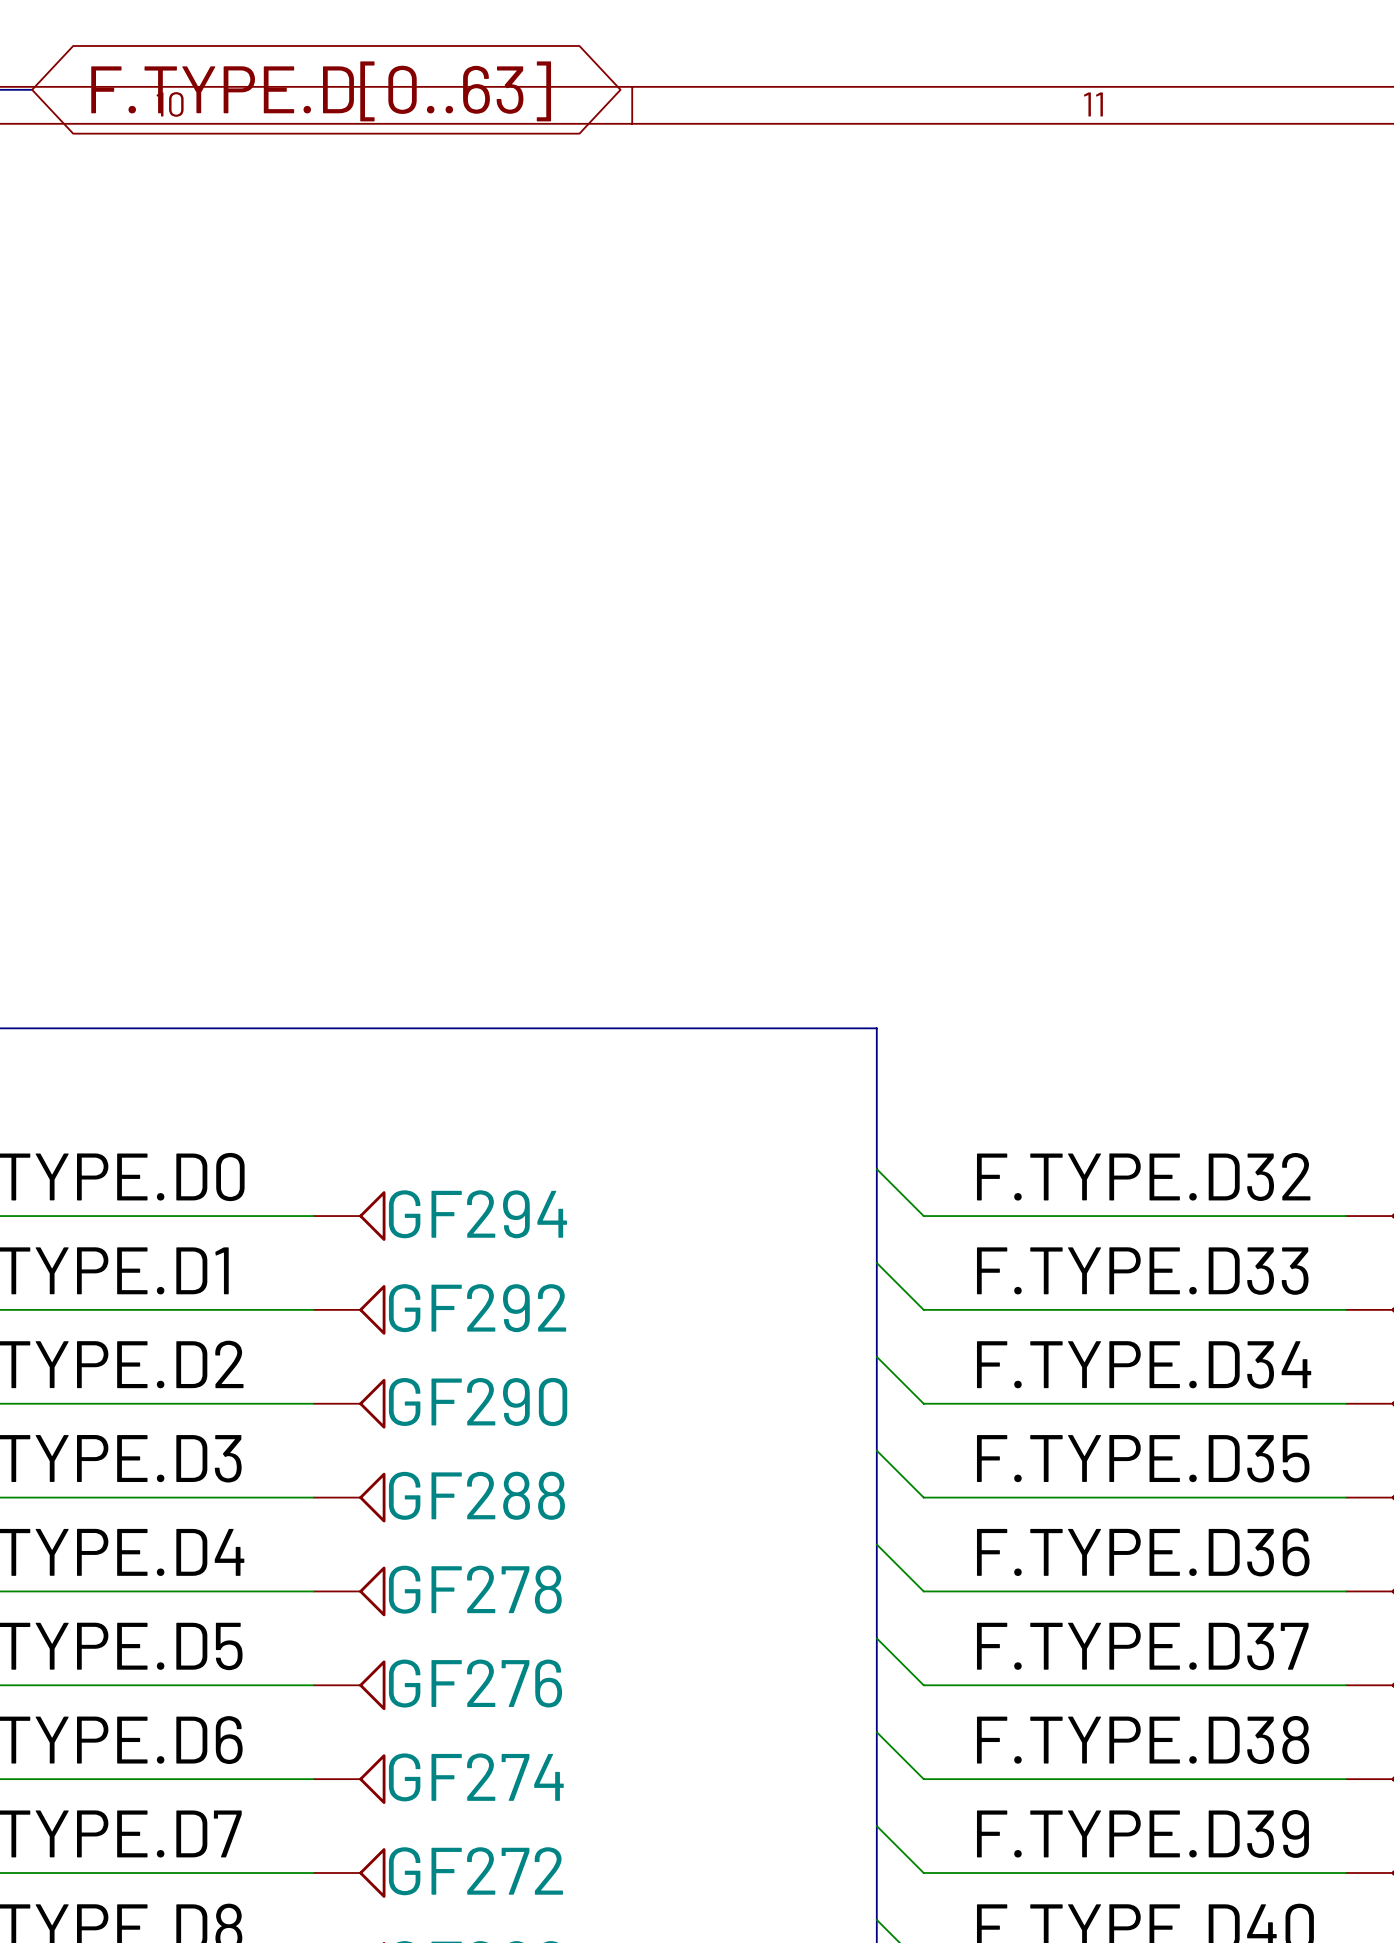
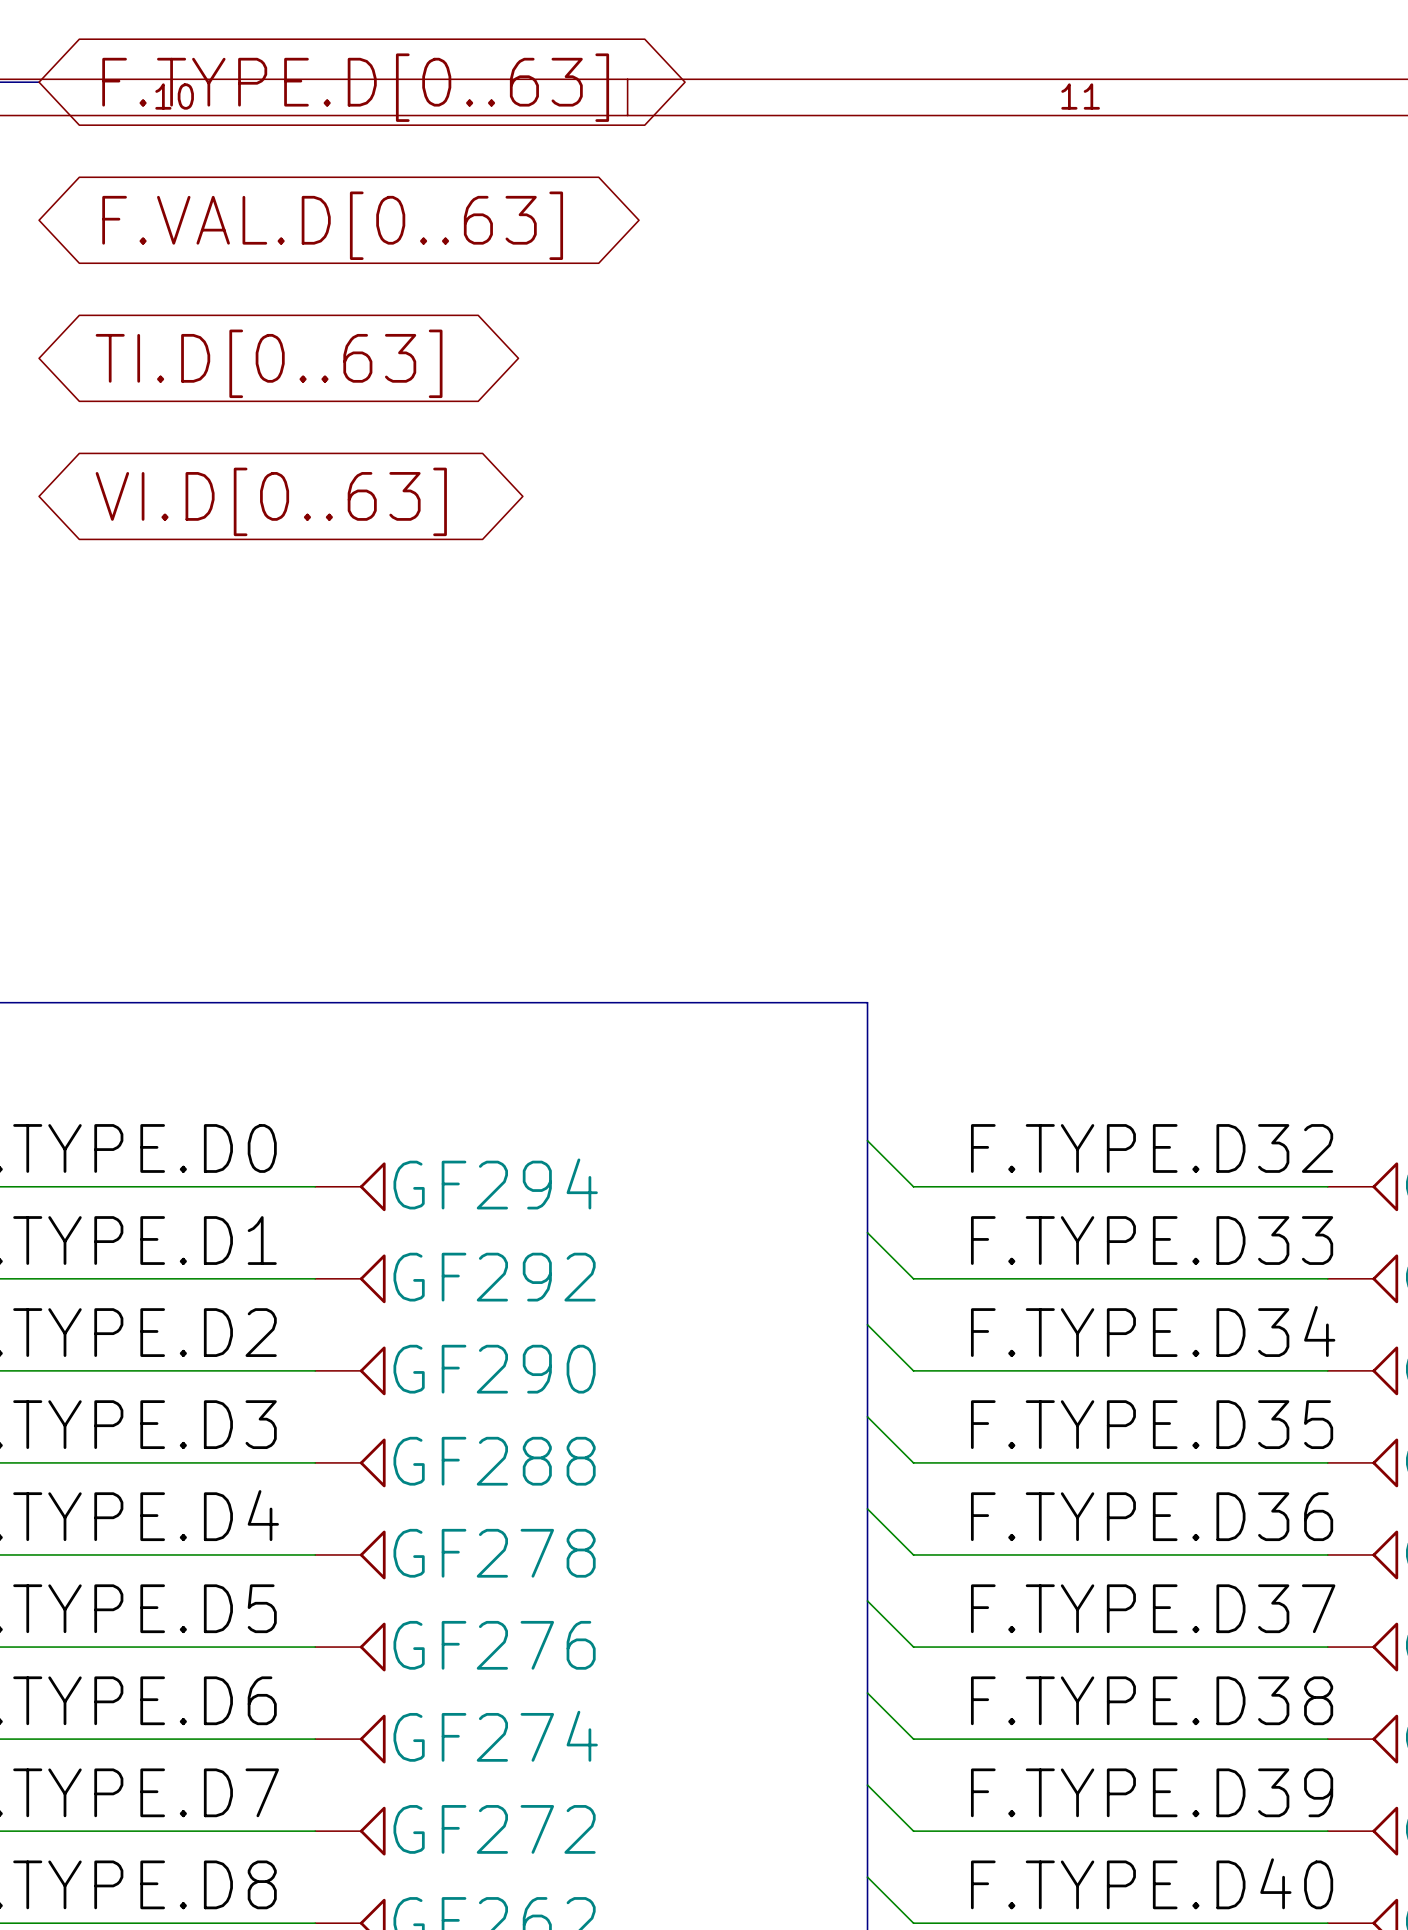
global label: none -> F.VAL.D[0..63] (332, 225)
global label: none -> TI.D[0..63] (269, 363)
global label: none -> VI.D[0..63] (271, 501)

